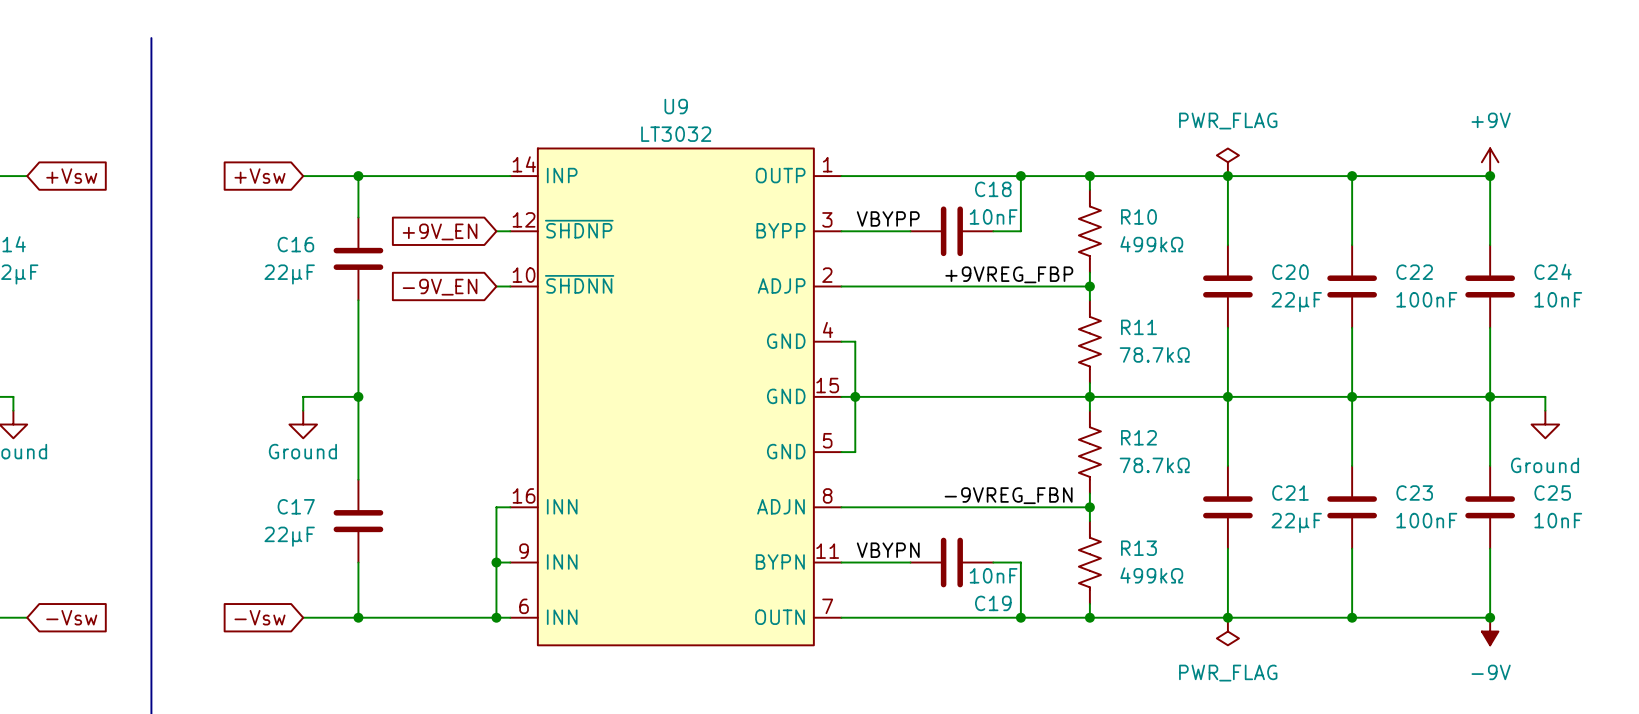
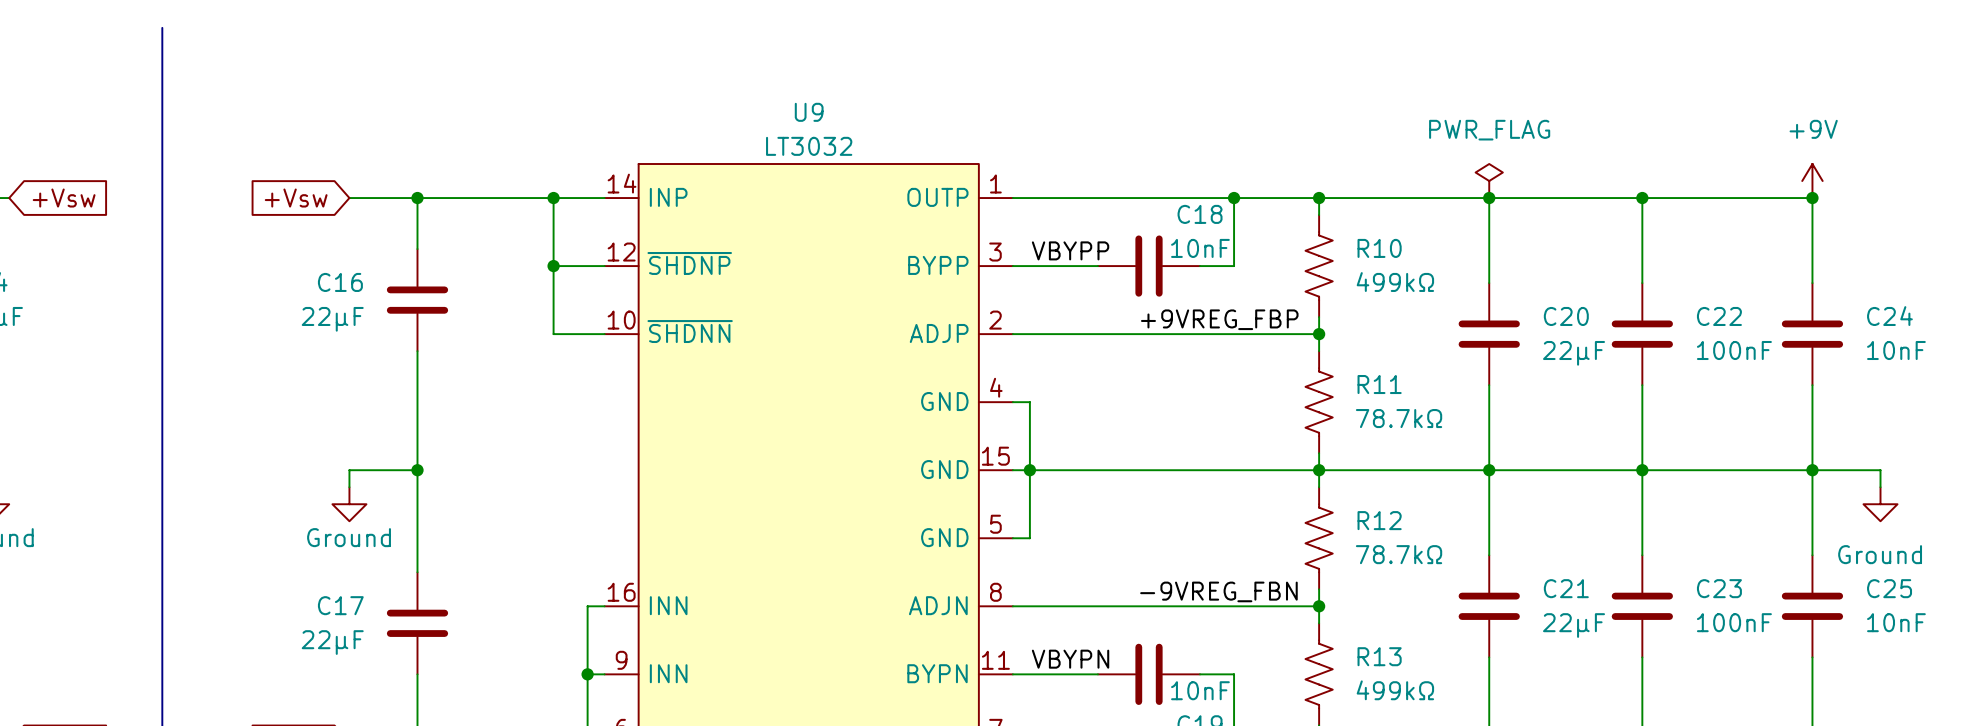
wire: none -> (553, 198) (553, 334) (587, 334)
junction: none -> (553, 198)
global label: +9V_EN (440, 231) -> none
wire: none -> (553, 266) (587, 266)
junction: none -> (553, 266)
global label: -9V_EN (440, 287) -> none

